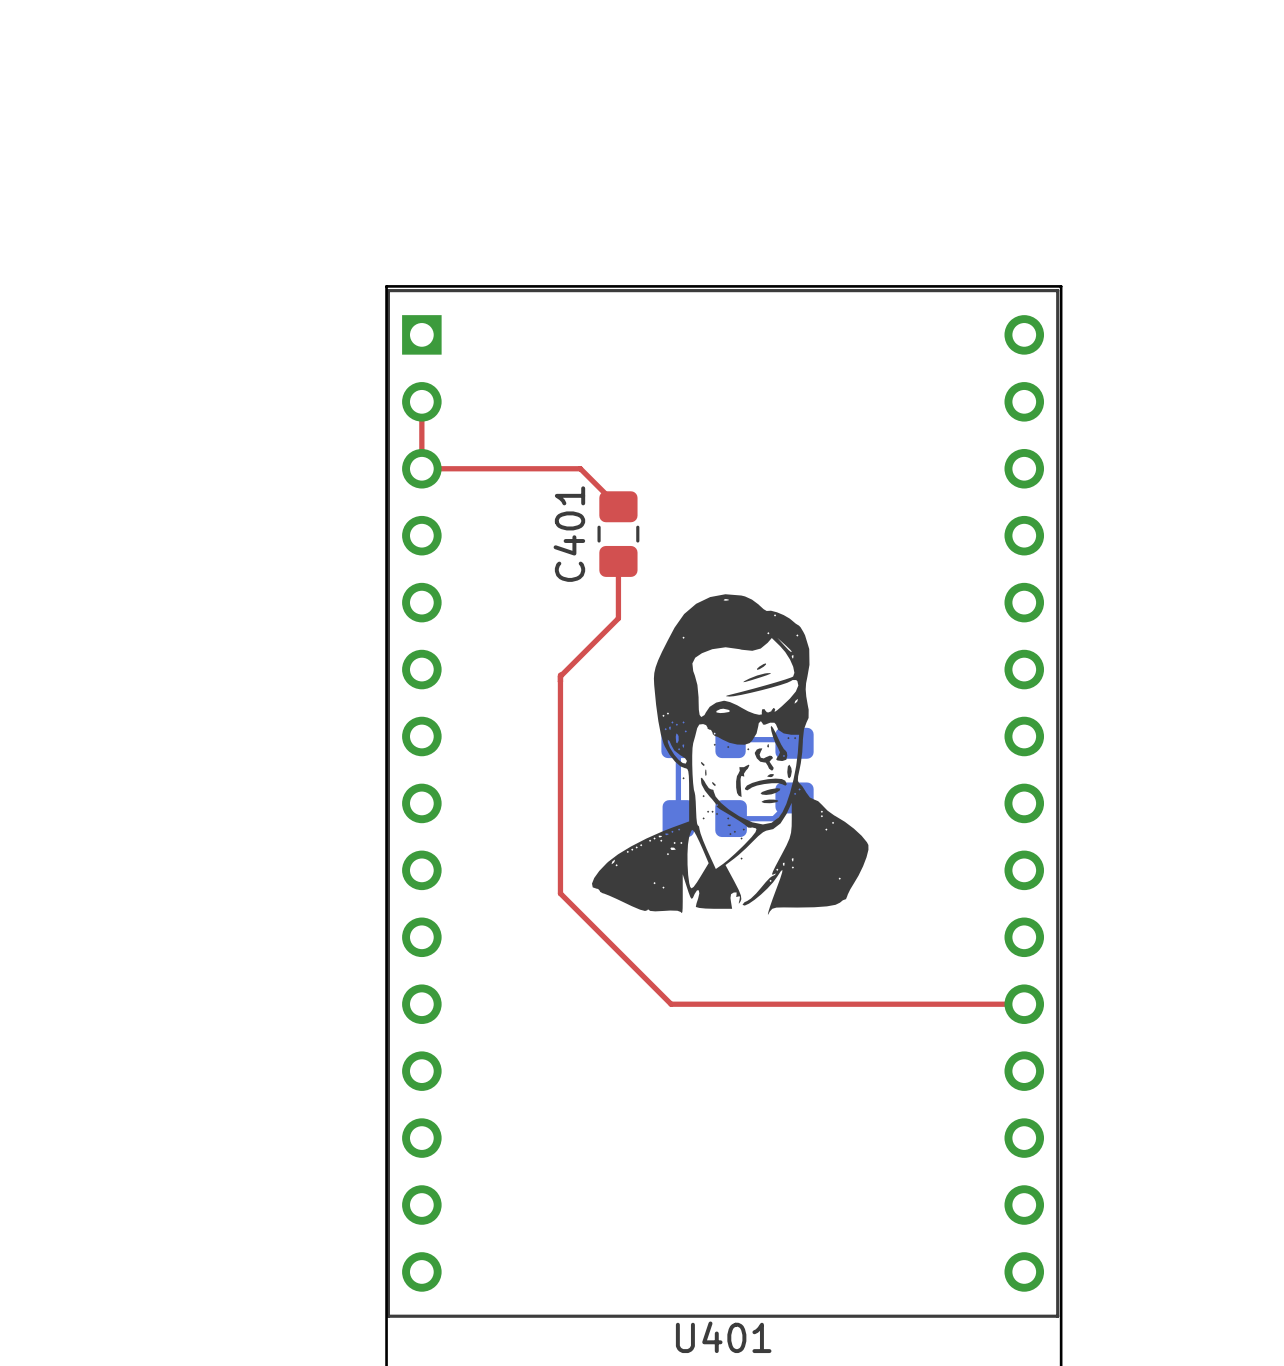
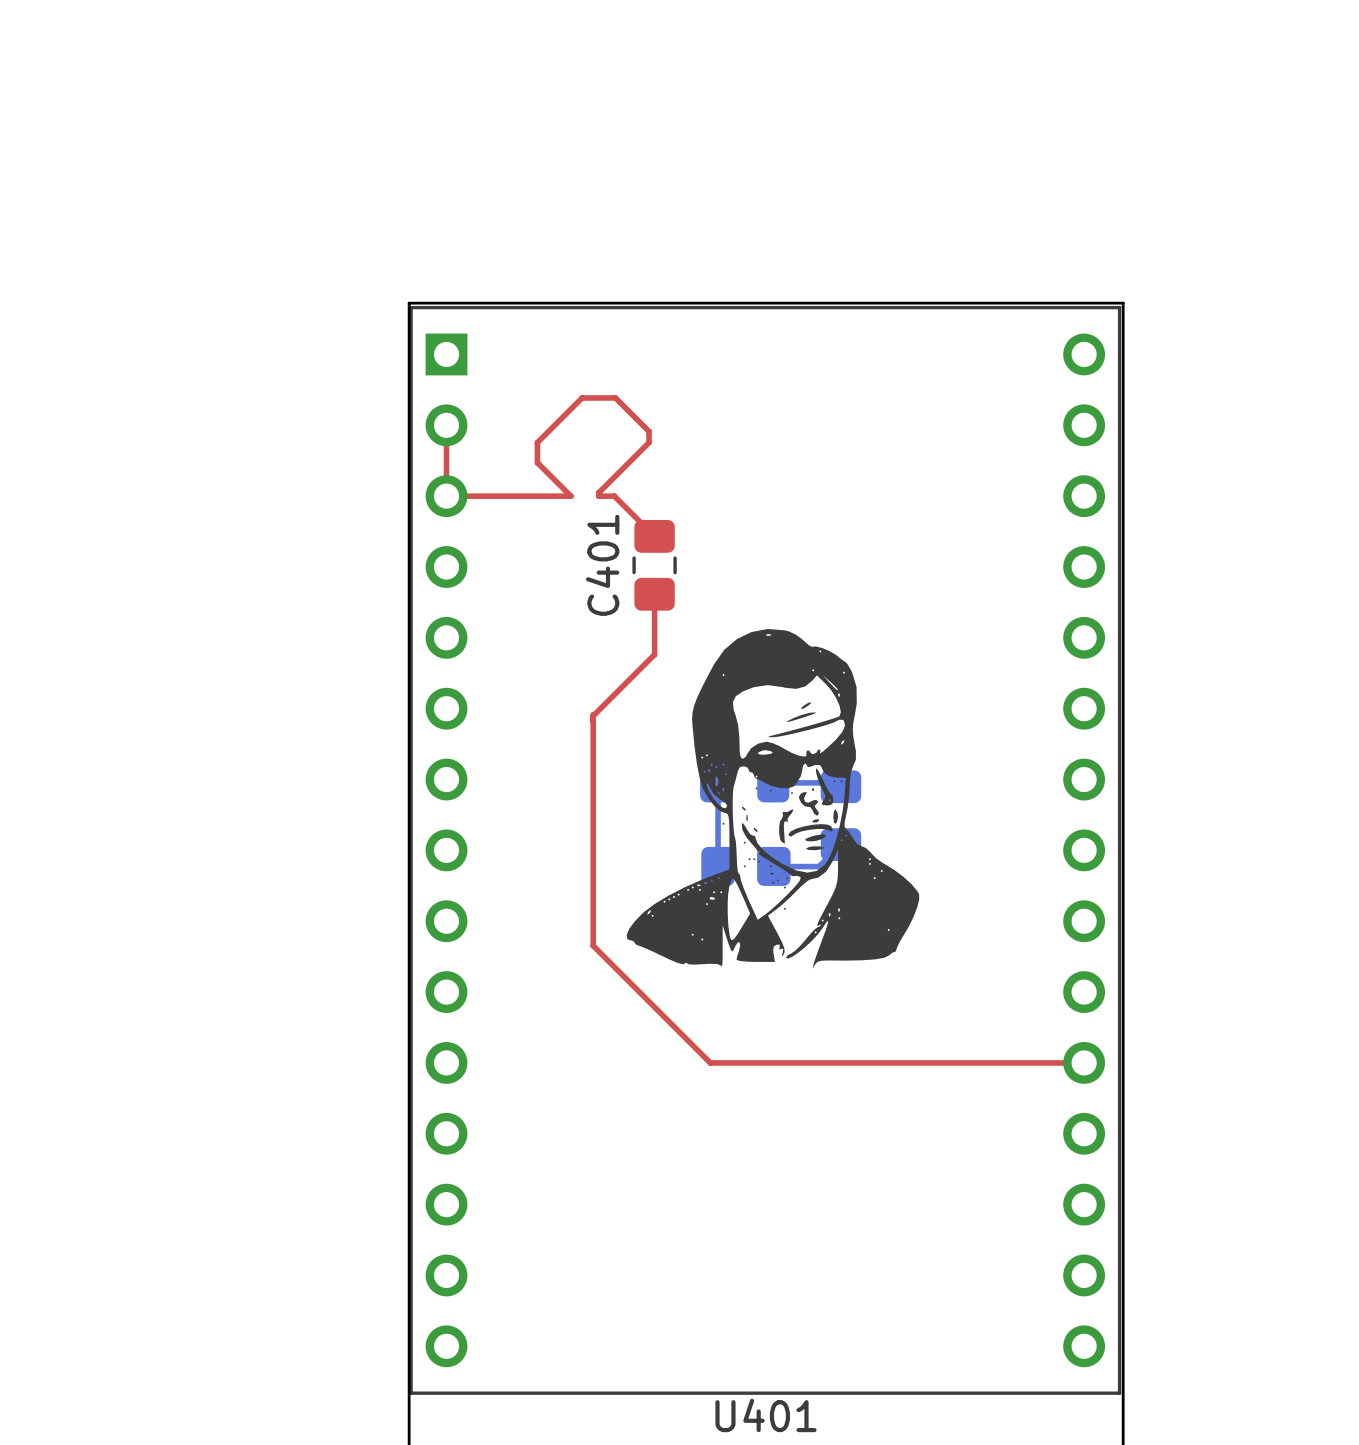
top track: (539, 468) (565, 468) -> (570, 496) (537, 462) (537, 442) (582, 397) (615, 397) (649, 431) (649, 442) (598, 492) (598, 496)

